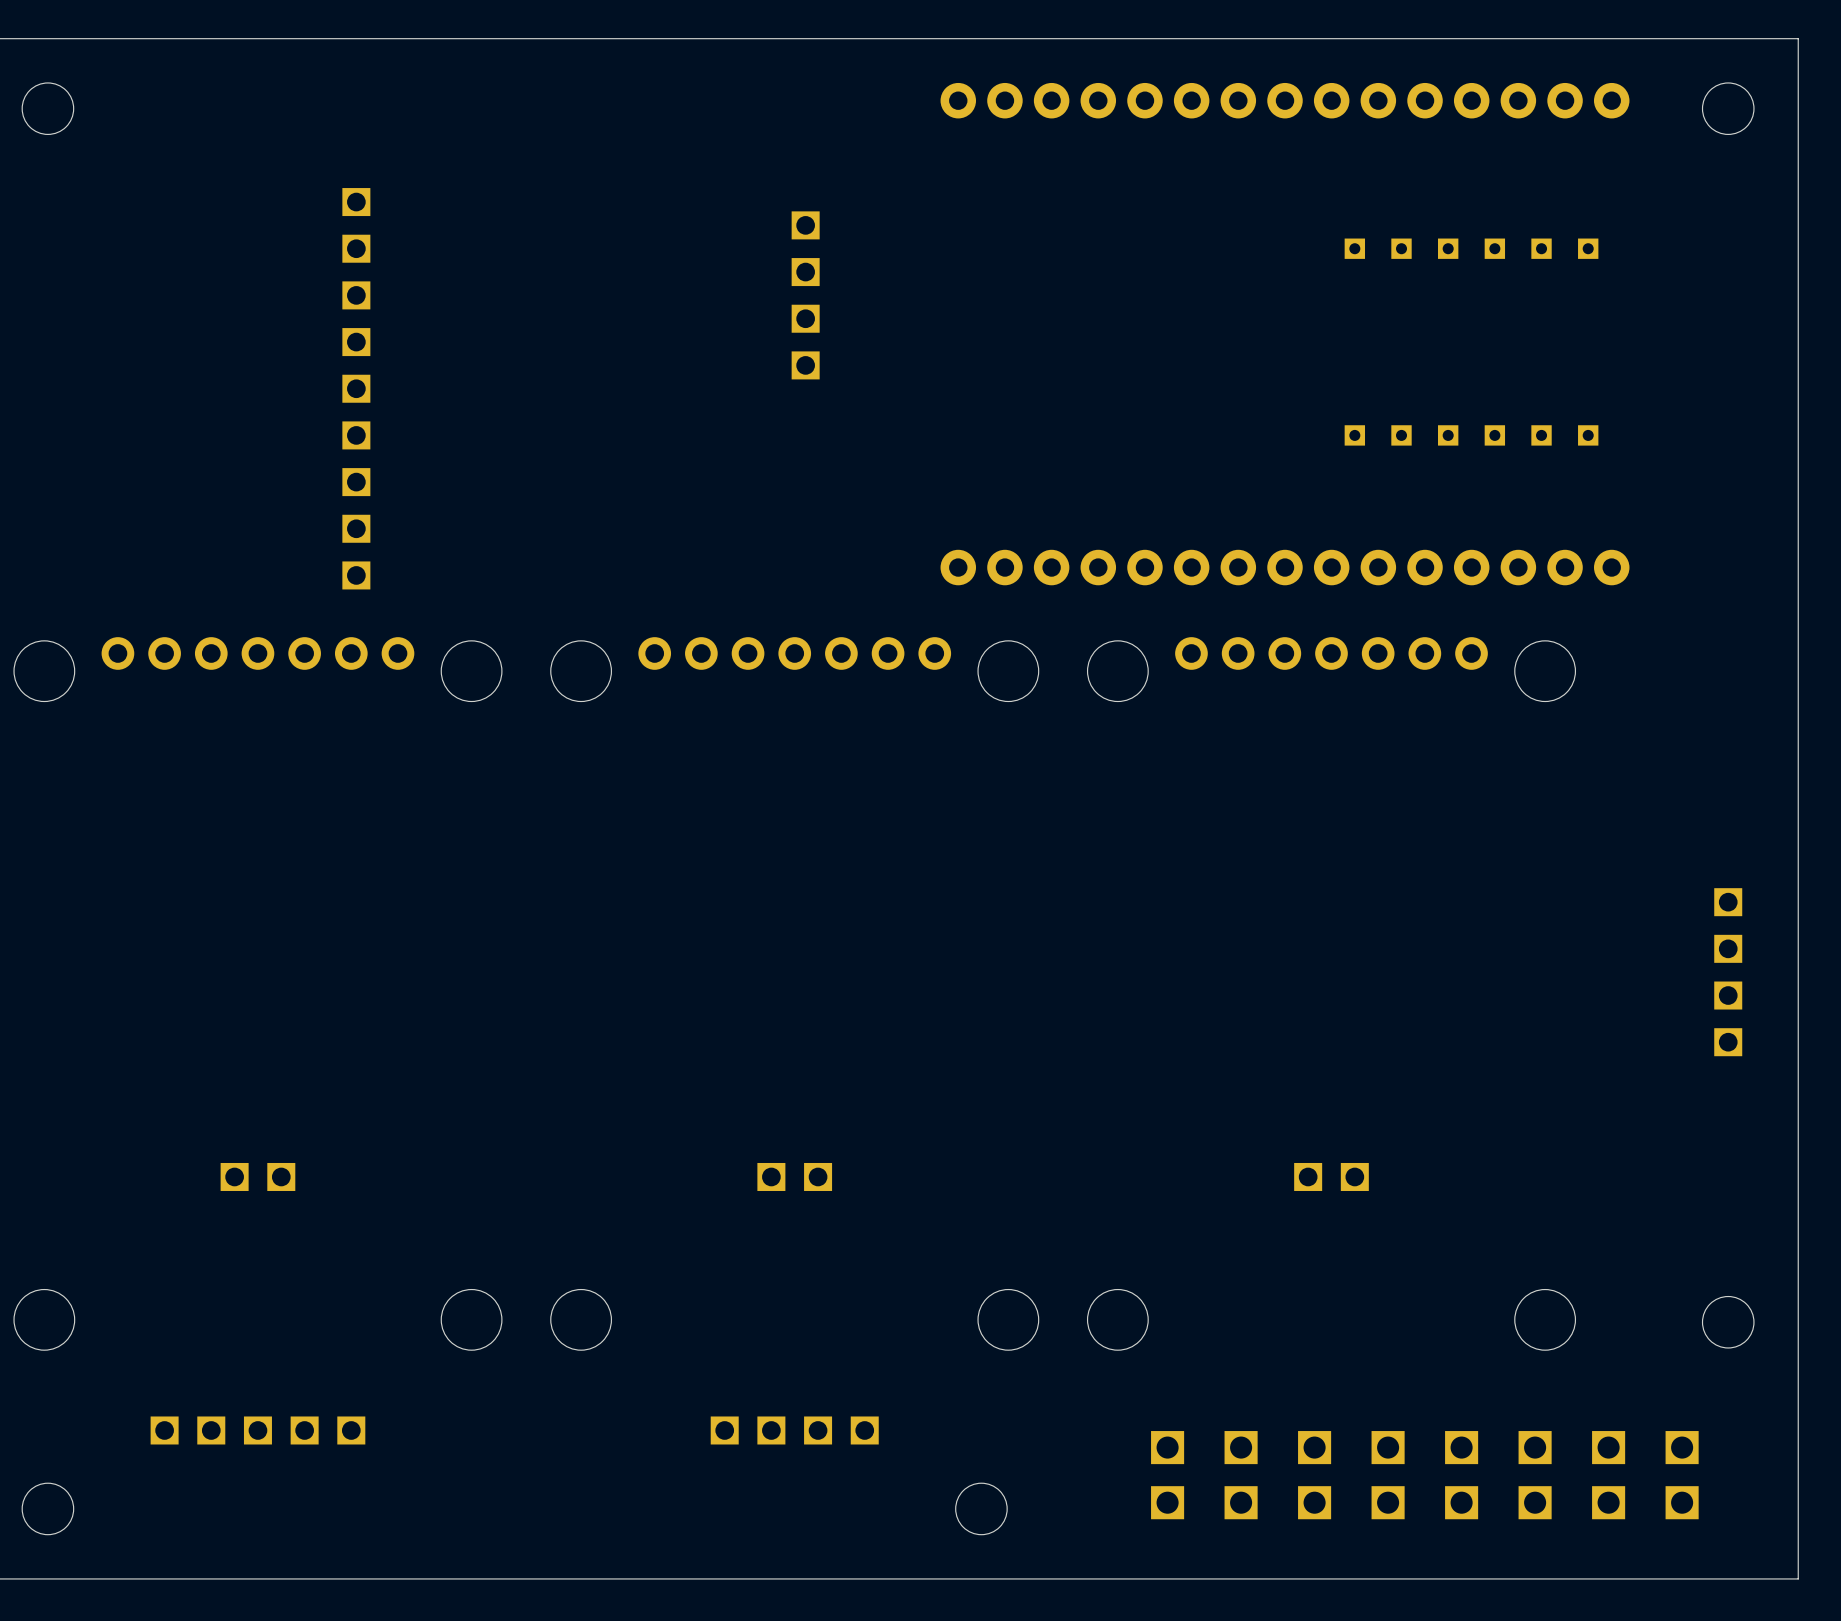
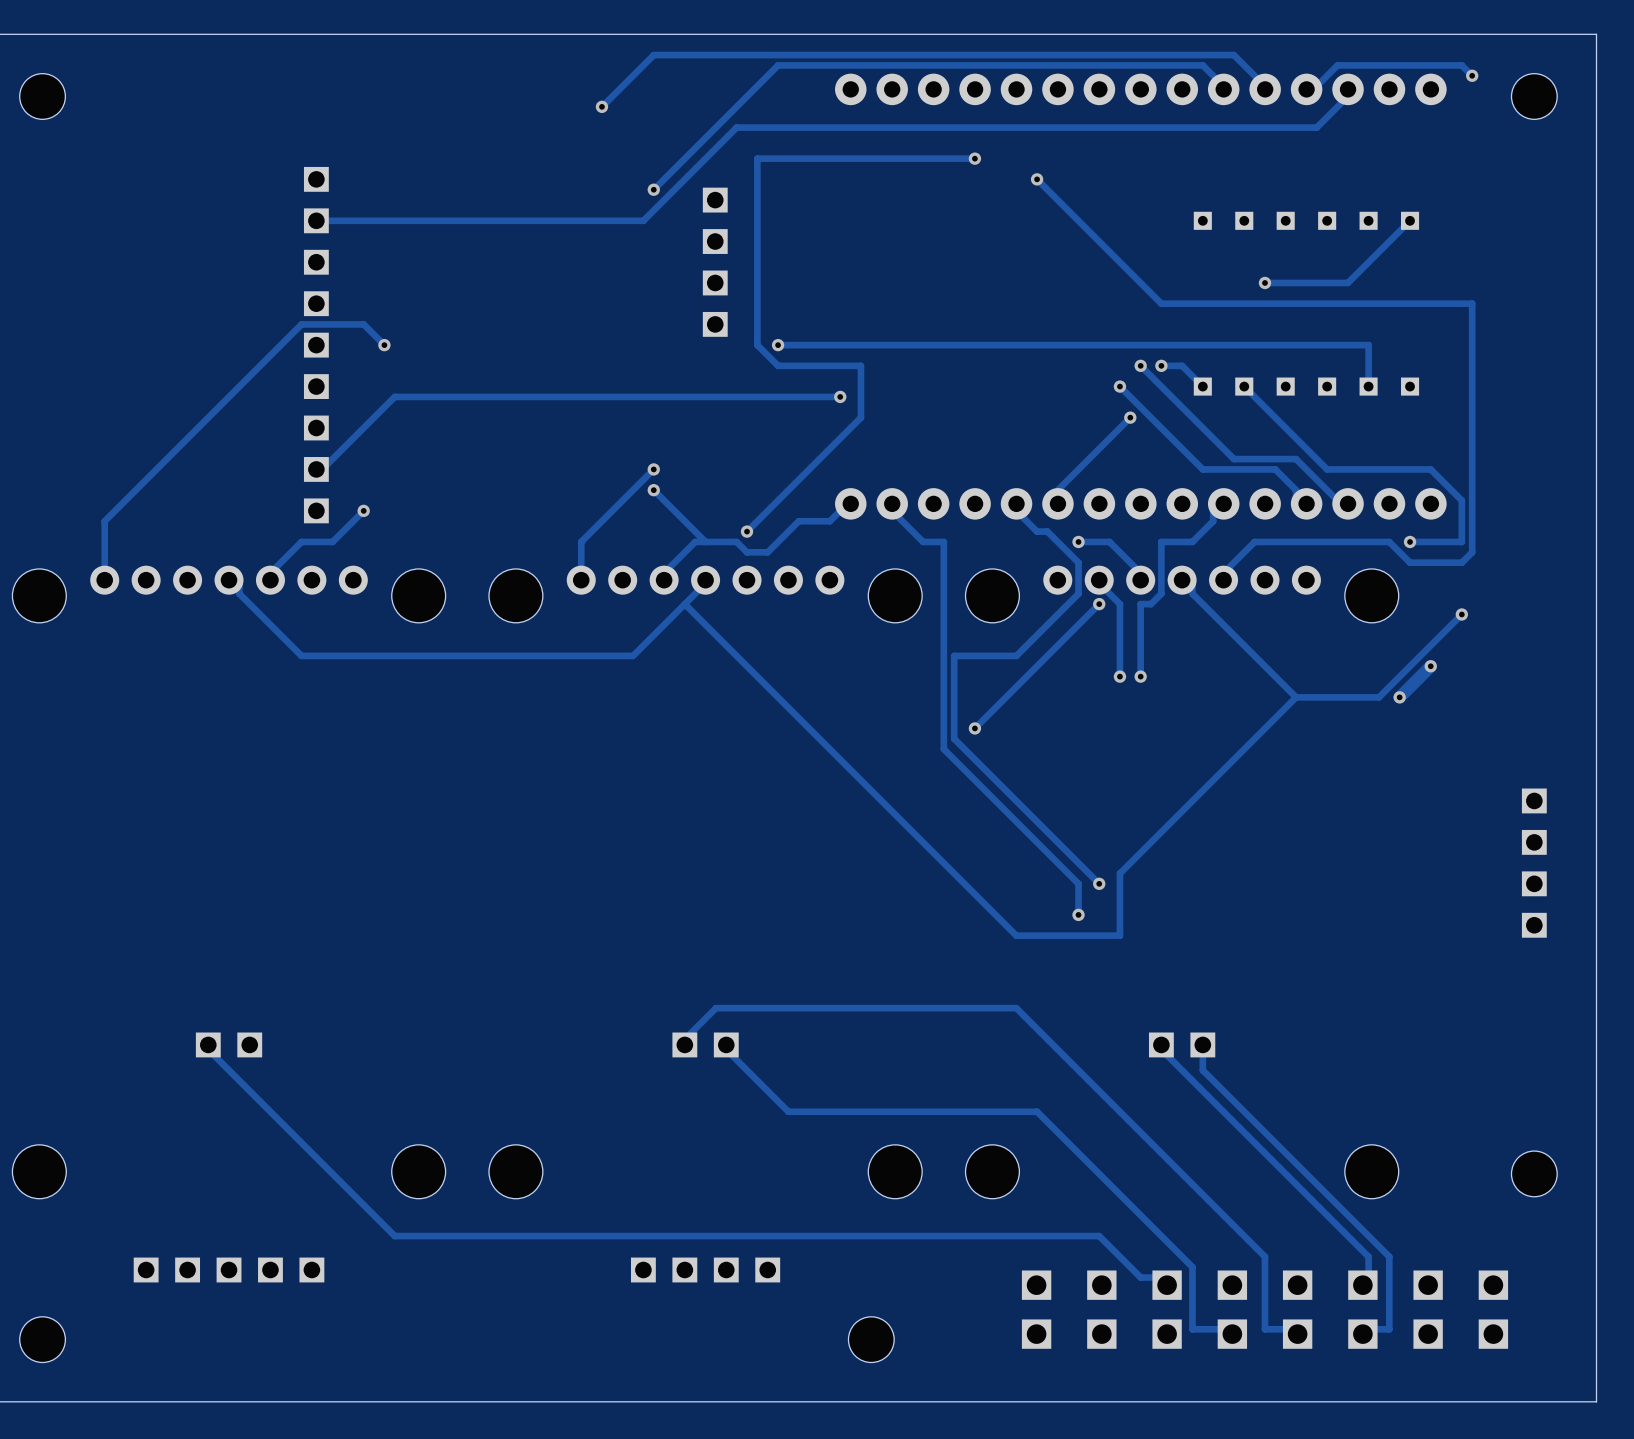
track: none -> (1472, 75) (1461, 65) (1337, 65) (1316, 86) (1306, 89)
via: none -> (1472, 75)
track: none -> (1223, 89) (1223, 86) (1202, 65) (778, 65) (653, 189)
track: none -> (1265, 89) (1264, 86) (1233, 55) (653, 55) (601, 106)
track: none -> (1348, 89) (1347, 96) (1316, 127) (736, 127) (643, 220) (316, 220)
via: none -> (601, 106)
track: none -> (974, 158) (757, 158) (757, 345) (778, 365) (860, 365) (860, 417) (747, 531)
via: none -> (974, 158)
track: none -> (1037, 179) (1161, 303) (1472, 303) (1472, 552) (1461, 562) (1410, 562) (1389, 541) (1254, 541) (1223, 573) (1223, 580)
via: none -> (1037, 179)
via: none -> (653, 189)
track: none -> (1410, 220) (1347, 282) (1264, 282)
via: none -> (1264, 282)
track: none -> (384, 345) (363, 324) (301, 324) (104, 521) (104, 580)
via: none -> (384, 345)
track: none -> (778, 345) (1368, 345) (1368, 386)
via: none -> (778, 345)
track: none -> (1140, 365) (1233, 459) (1296, 459) (1337, 500) (1347, 500) (1348, 503)
via: none -> (1140, 365)
track: none -> (1161, 365) (1182, 365) (1202, 386)
via: none -> (1161, 365)
track: none -> (1119, 386) (1202, 469) (1275, 469) (1296, 490) (1296, 500) (1306, 500) (1306, 503)
via: none -> (1119, 386)
track: none -> (1244, 386) (1327, 469) (1430, 469) (1461, 500) (1461, 541) (1410, 541)
track: none -> (840, 396) (394, 396) (322, 469) (316, 469)
via: none -> (840, 396)
track: none -> (1130, 417) (1047, 500) (1047, 510) (1057, 510) (1057, 503)
via: none -> (1130, 417)
track: none -> (653, 469) (581, 541) (581, 580)
via: none -> (653, 469)
track: none -> (653, 490) (705, 541)
via: none -> (653, 490)
track: none -> (850, 503) (850, 510) (840, 510) (829, 521) (798, 521) (767, 552) (747, 552) (736, 541) (695, 541) (664, 573) (664, 580)
track: none -> (892, 503) (892, 510) (923, 541) (943, 541) (943, 749) (1078, 883) (1078, 914)
track: none -> (1016, 503) (1016, 510) (1037, 531) (1047, 531) (1078, 562) (1078, 593) (1016, 655) (954, 655) (954, 738) (1099, 883)
track: none -> (1223, 503) (1223, 510) (1213, 510) (1213, 521) (1192, 541) (1161, 541) (1161, 593) (1151, 604) (1140, 604) (1140, 676)
track: none -> (363, 510) (332, 541) (301, 541) (270, 573) (270, 580)
via: none -> (363, 510)
via: none -> (747, 531)
track: none -> (1078, 541) (1109, 541) (1140, 573) (1140, 580)
via: none -> (1078, 541)
via: none -> (1410, 541)
track: none -> (705, 580) (705, 583) (633, 655) (301, 655) (239, 593) (239, 583) (229, 583) (229, 580)
track: none -> (1099, 580) (1099, 583) (1119, 604) (1119, 676)
track: none -> (1182, 580) (1182, 583) (1192, 583) (1192, 593) (1296, 697)
track: none -> (684, 604) (1016, 935) (1119, 935) (1119, 873) (1296, 697)
track: none -> (1099, 604) (974, 728)
via: none -> (1099, 604)
track: none -> (1461, 614) (1378, 697) (1296, 697)
via: none -> (1461, 614)
track: none -> (1430, 666) (1399, 697)
via: none -> (1430, 666)
via: none -> (1119, 676)
via: none -> (1140, 676)
via: none -> (1399, 697)
via: none -> (974, 728)
via: none -> (1099, 883)
via: none -> (1078, 914)
track: none -> (208, 1044) (208, 1049) (394, 1236) (1099, 1236) (1140, 1277) (1161, 1277) (1167, 1285)
track: none -> (684, 1044) (684, 1039) (715, 1008) (1016, 1008) (1264, 1256) (1264, 1329) (1296, 1329) (1297, 1334)
track: none -> (726, 1044) (726, 1049) (788, 1111) (1037, 1111) (1192, 1267) (1192, 1329) (1223, 1329) (1232, 1334)
track: none -> (1161, 1044) (1161, 1049) (1368, 1256) (1368, 1277) (1362, 1285)
track: none -> (1202, 1044) (1202, 1070) (1389, 1256) (1389, 1329) (1368, 1329) (1362, 1334)

